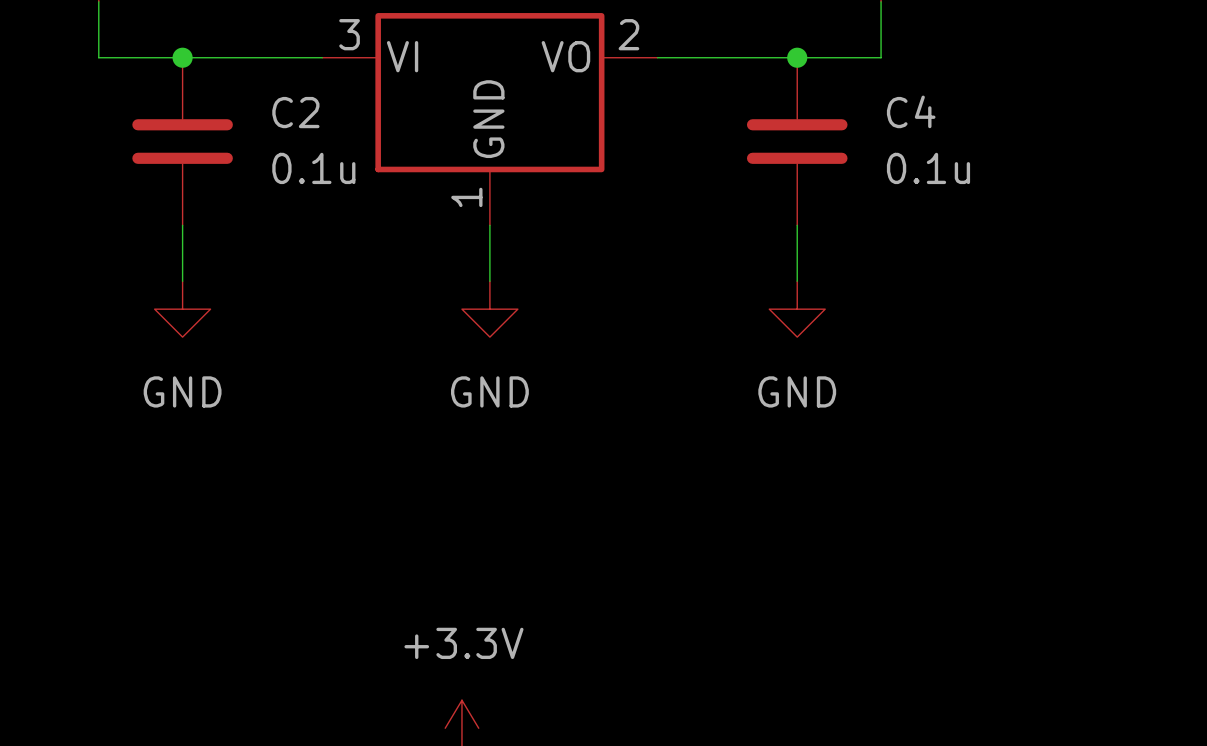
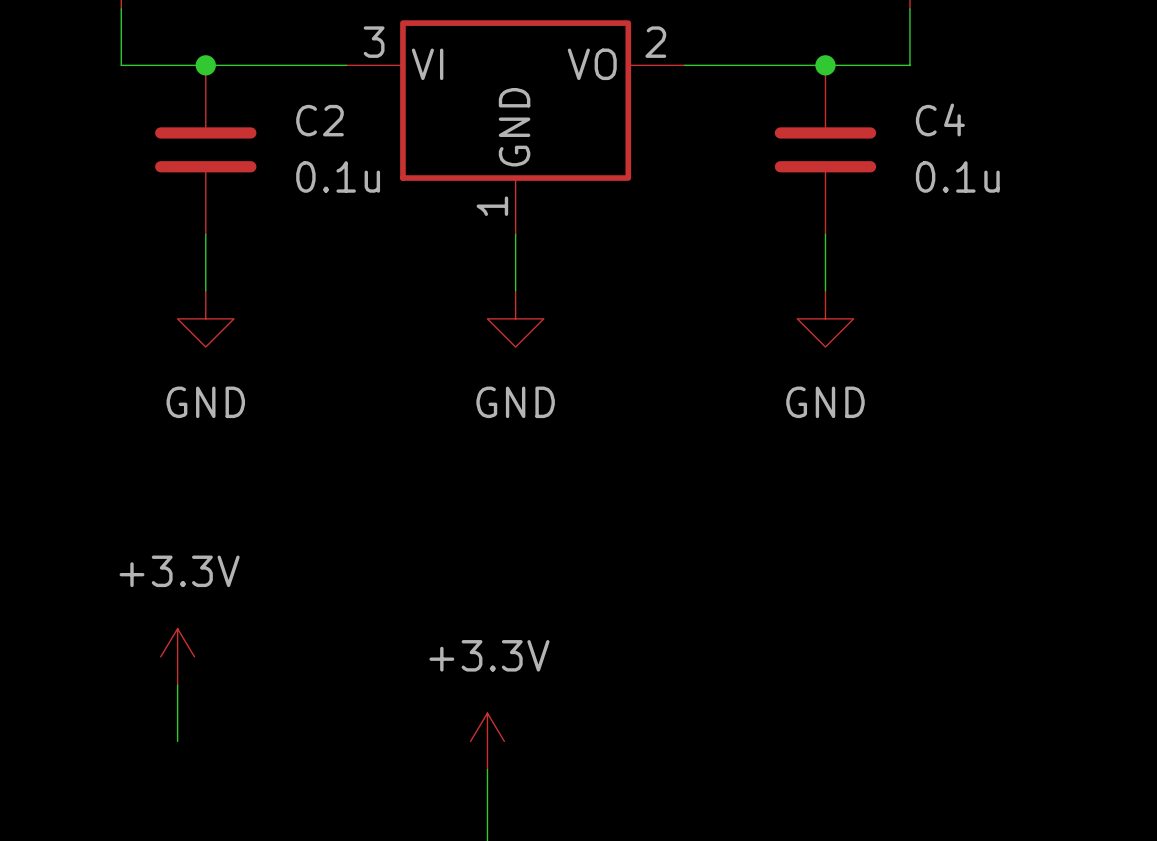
power symbol: none -> +3.3V (177, 656)
wire: none -> (177, 685) (177, 741)

